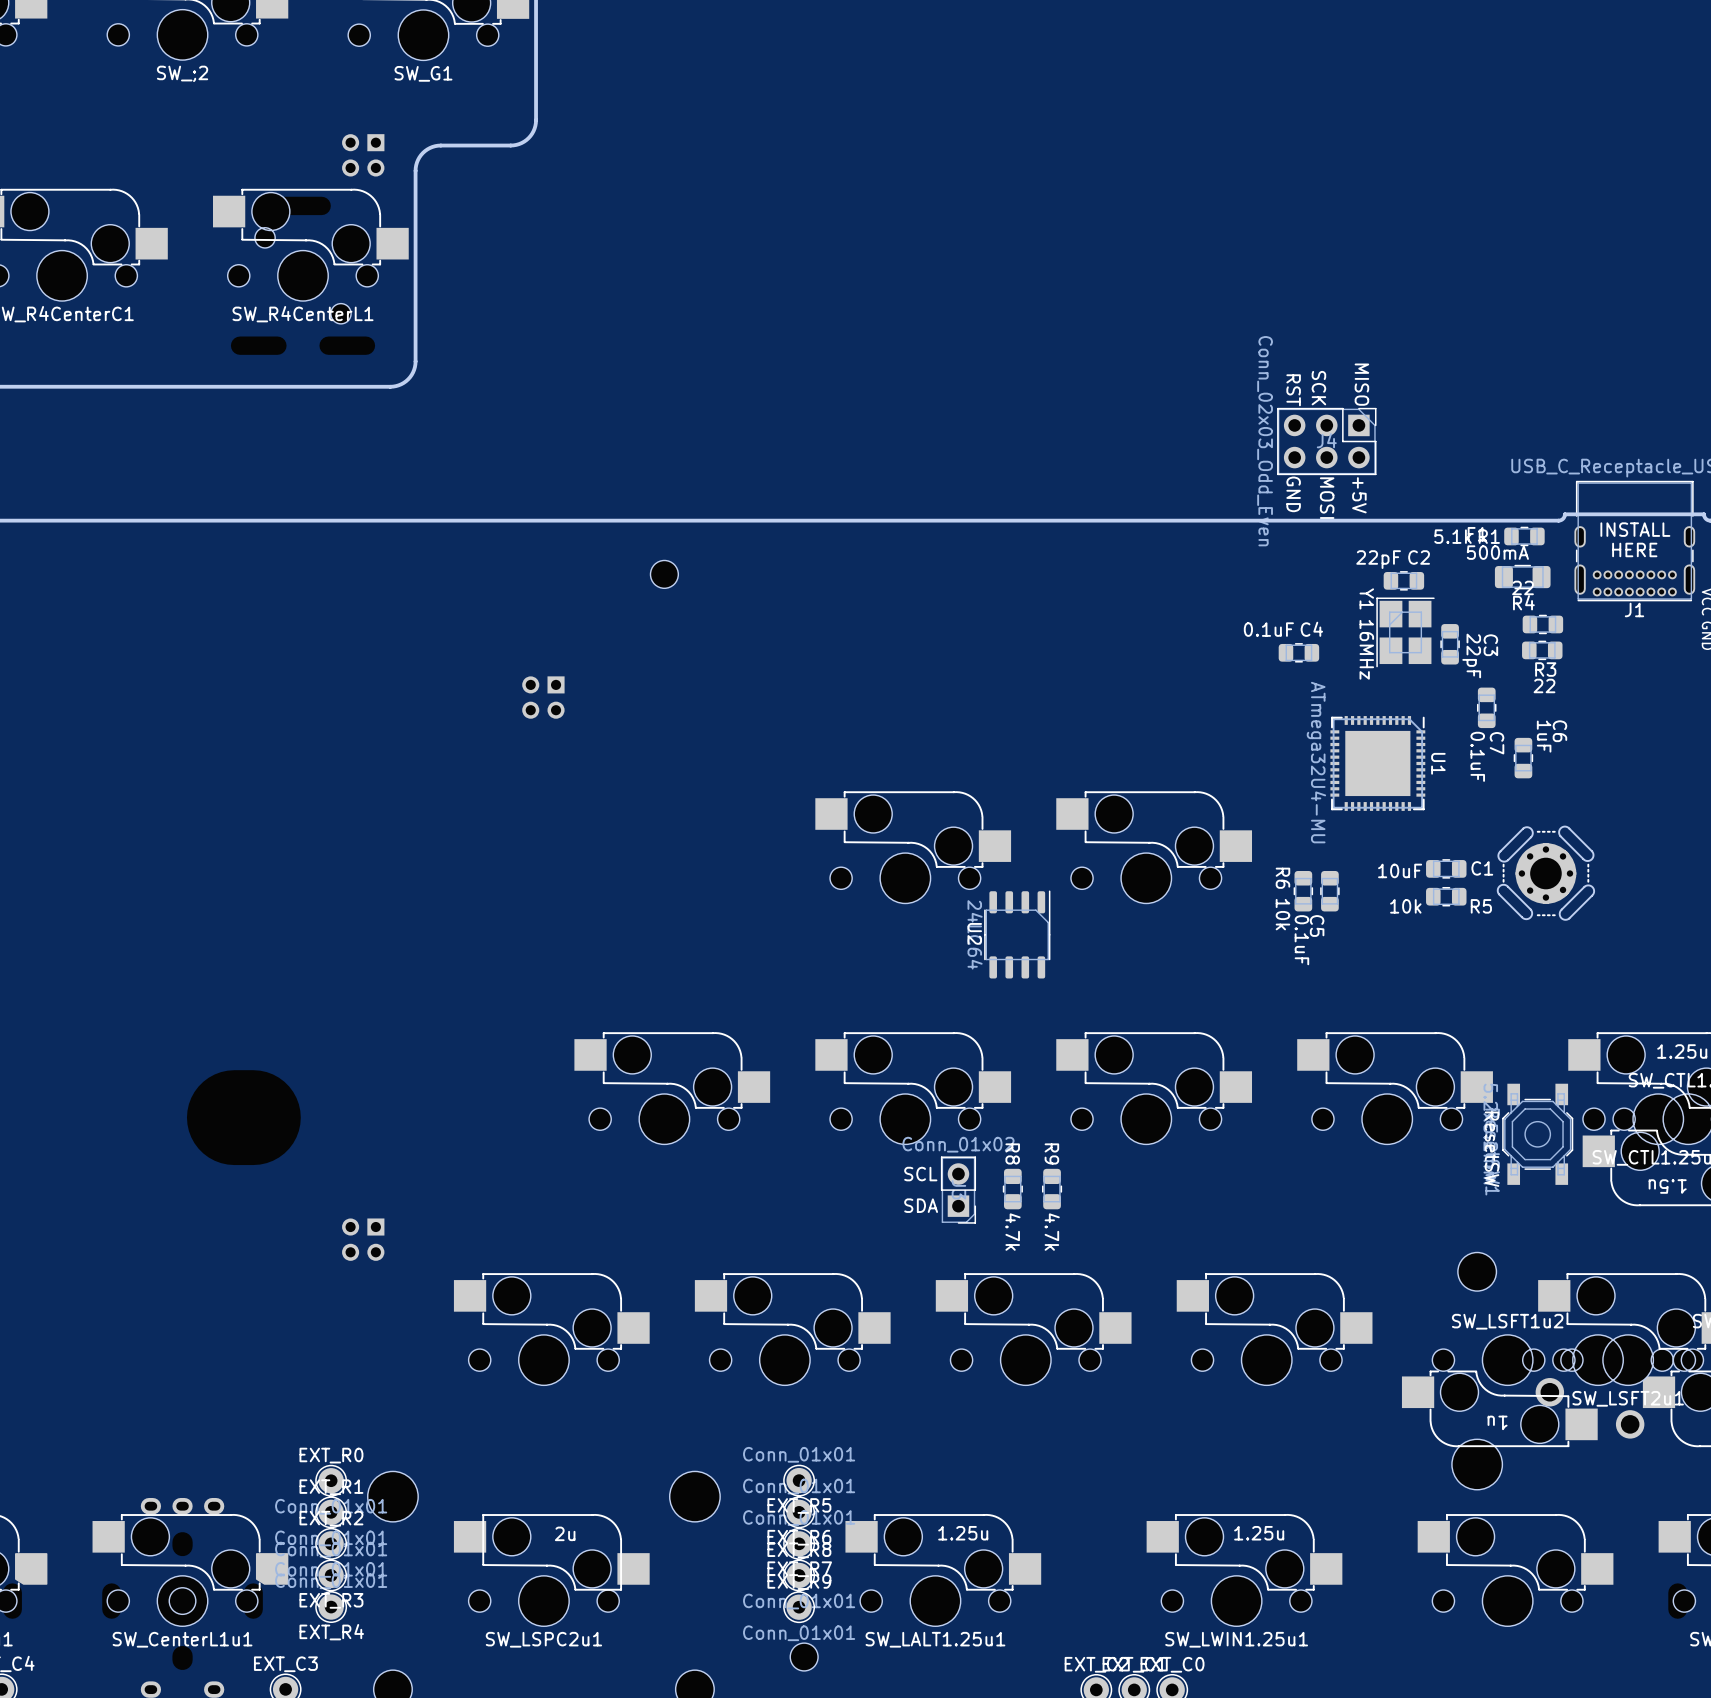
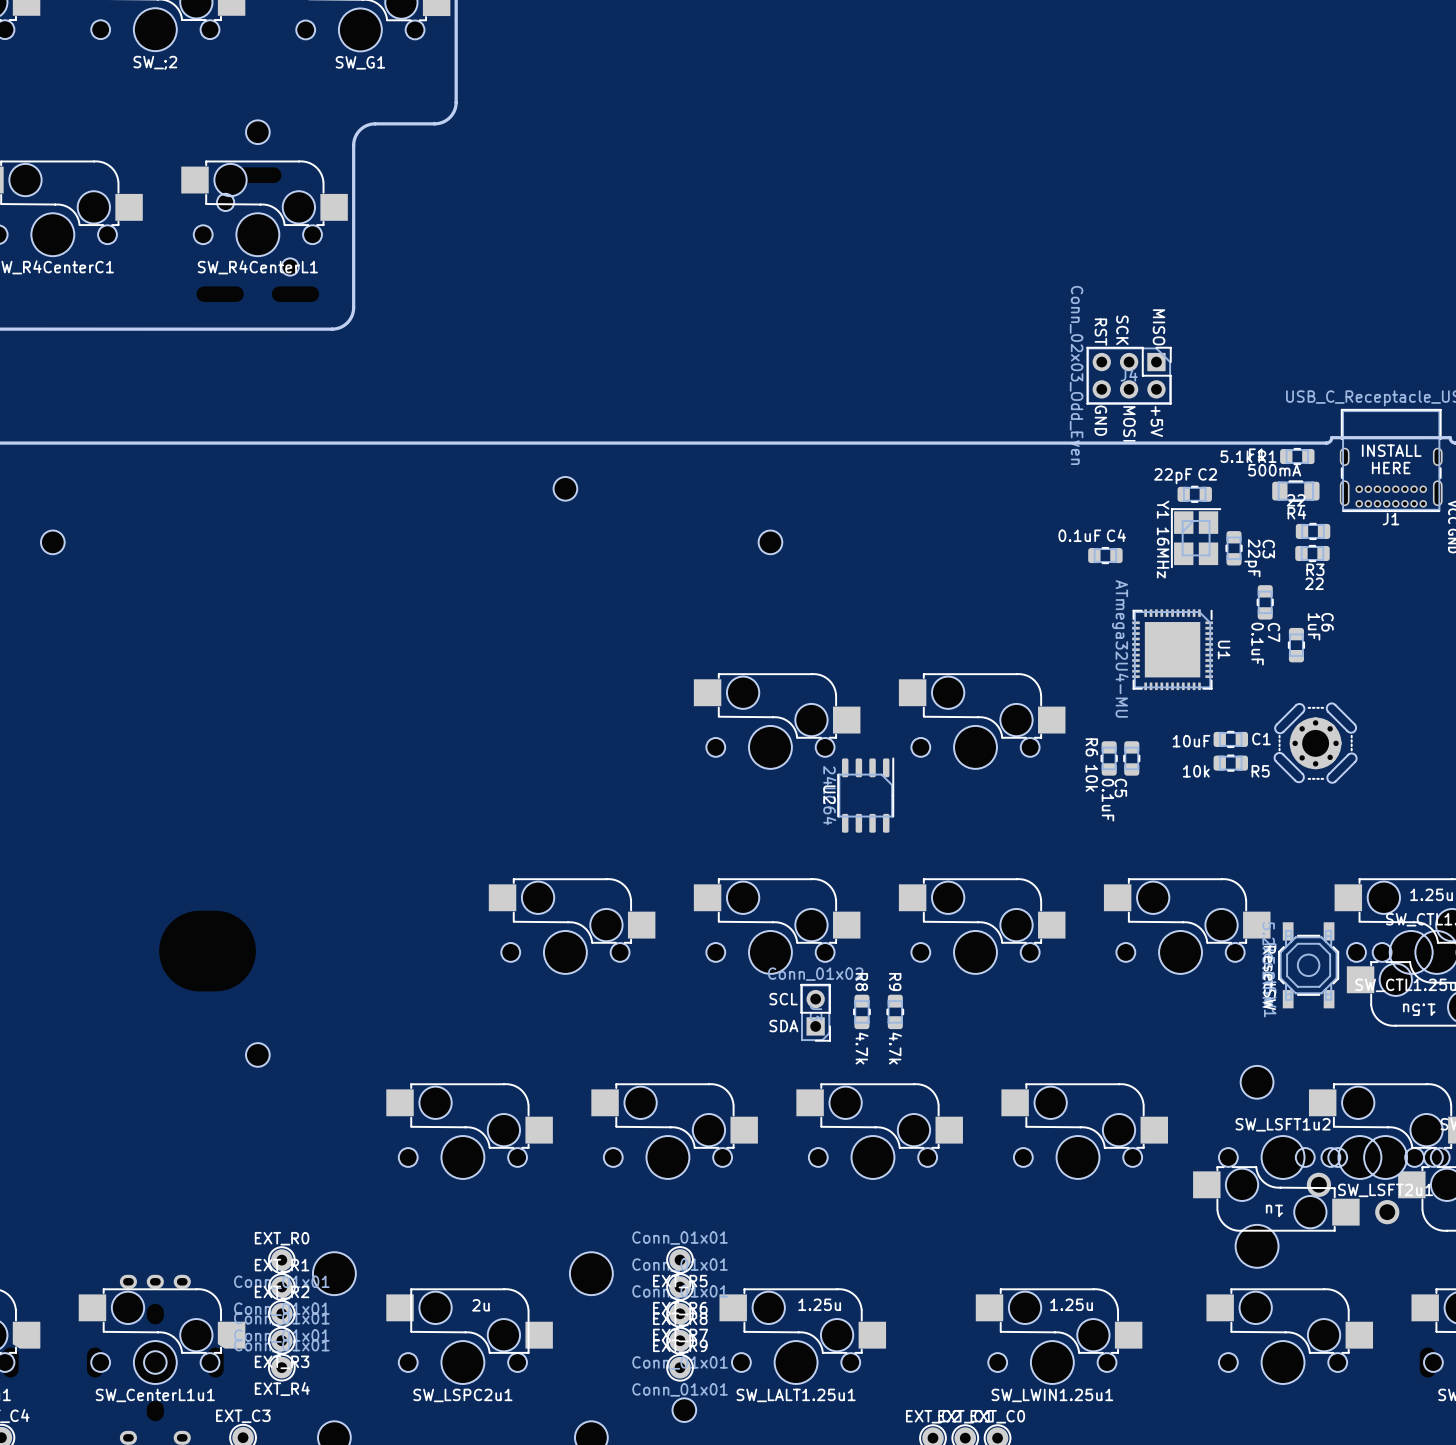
part: none -> (257, 132)
part: (363, 155) -> none
part: none -> (52, 542)
part: none -> (770, 542)
part: (543, 697) -> none
part: none -> (257, 1054)
part: (363, 1239) -> none

